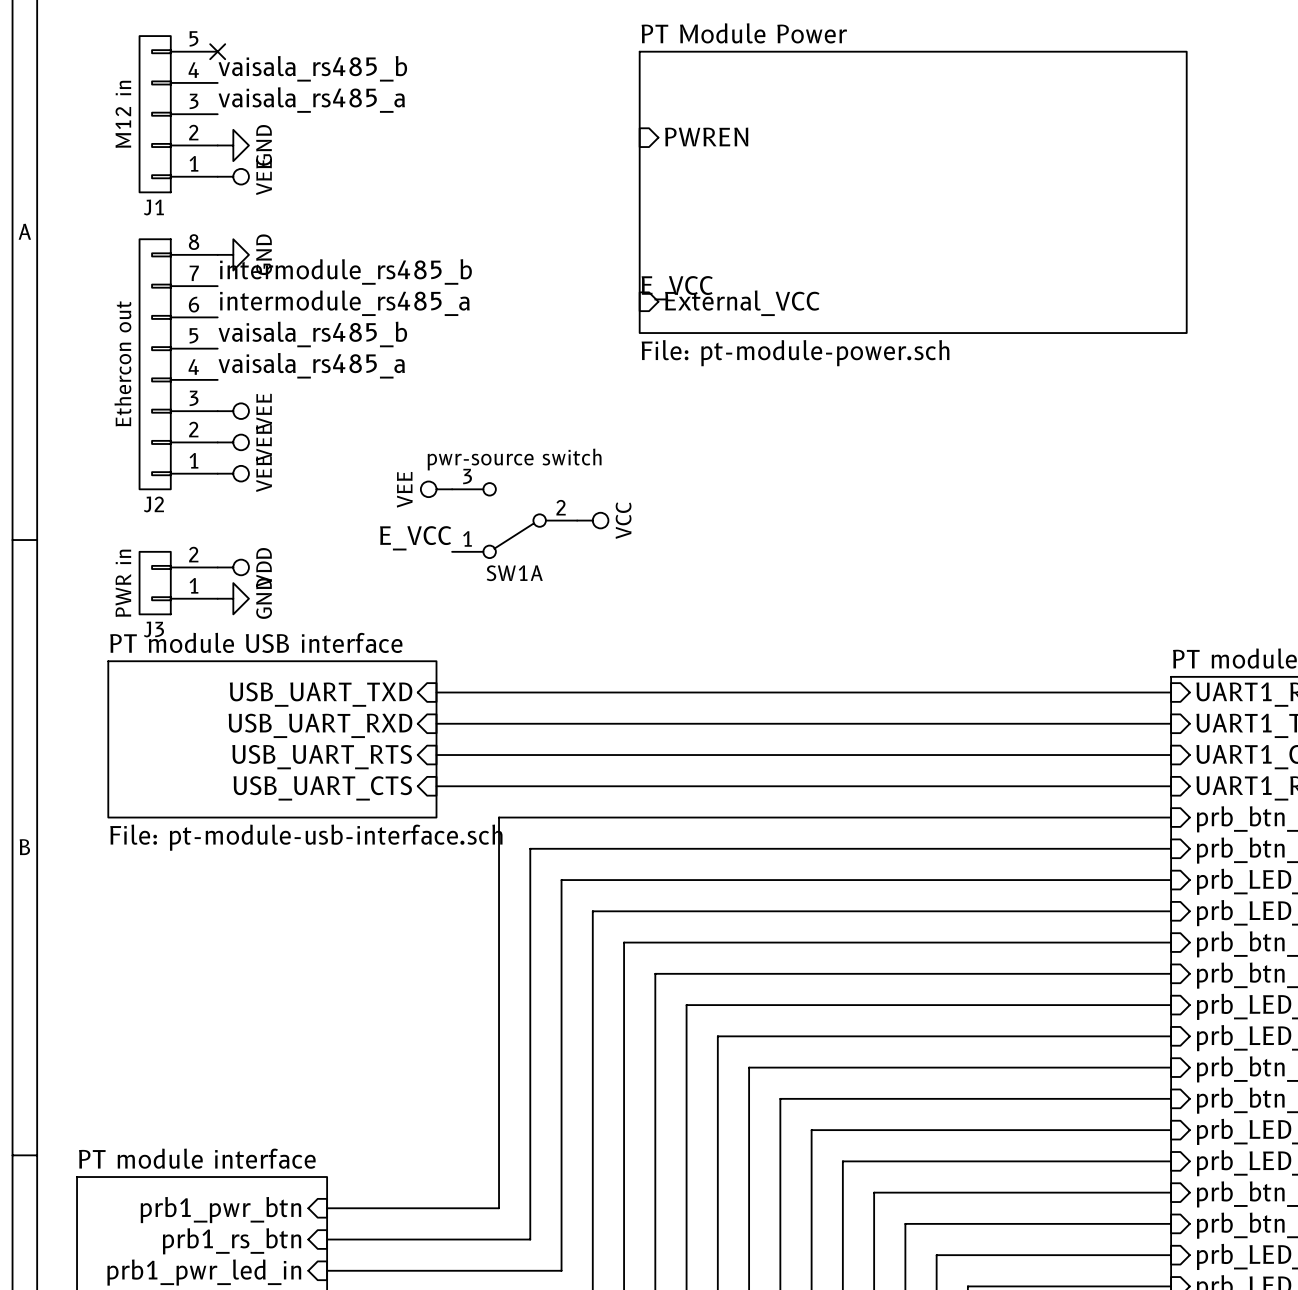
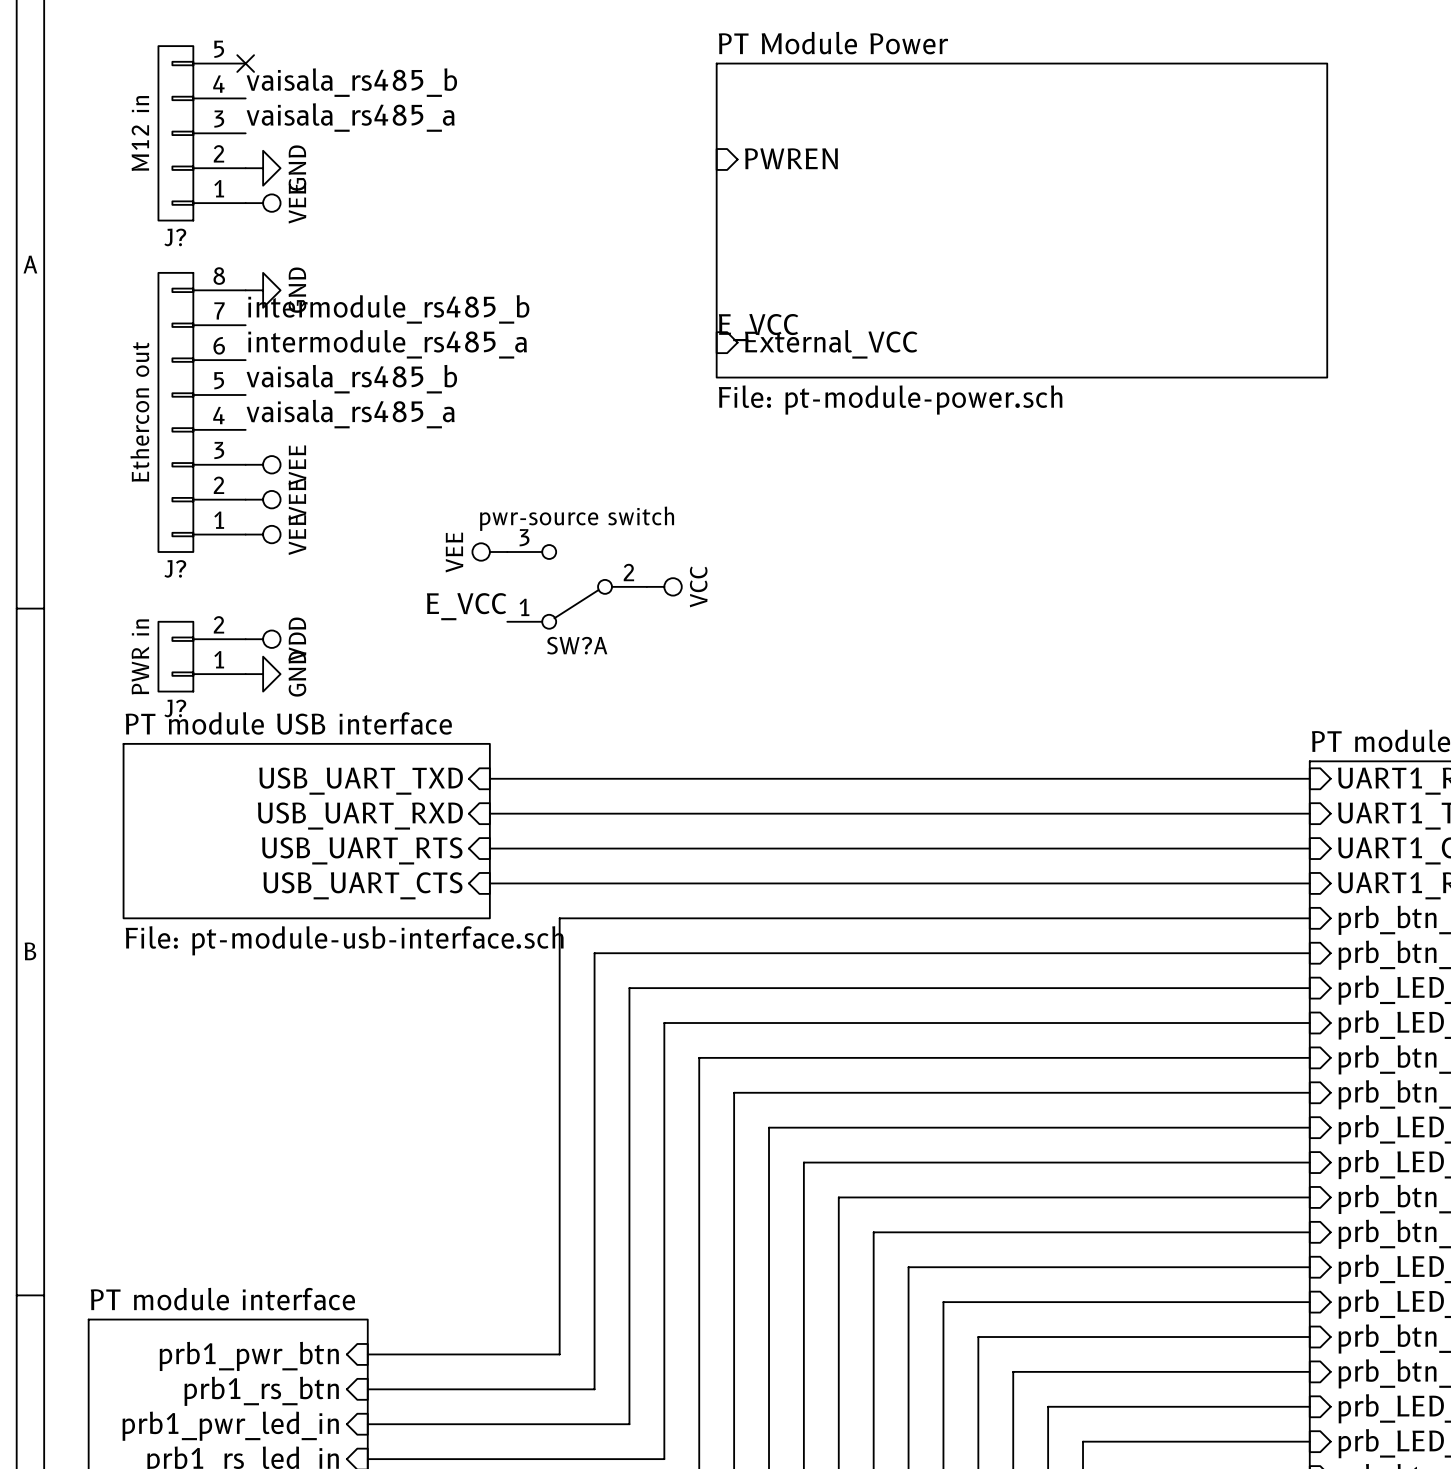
J1 name: J1 (153, 207) -> J? (175, 237)
J2 name: J2 (153, 504) -> J? (175, 568)
SW1A name: SW1A (514, 573) -> SW?A (577, 645)
J3 name: J3 (153, 629) -> J? (175, 708)

